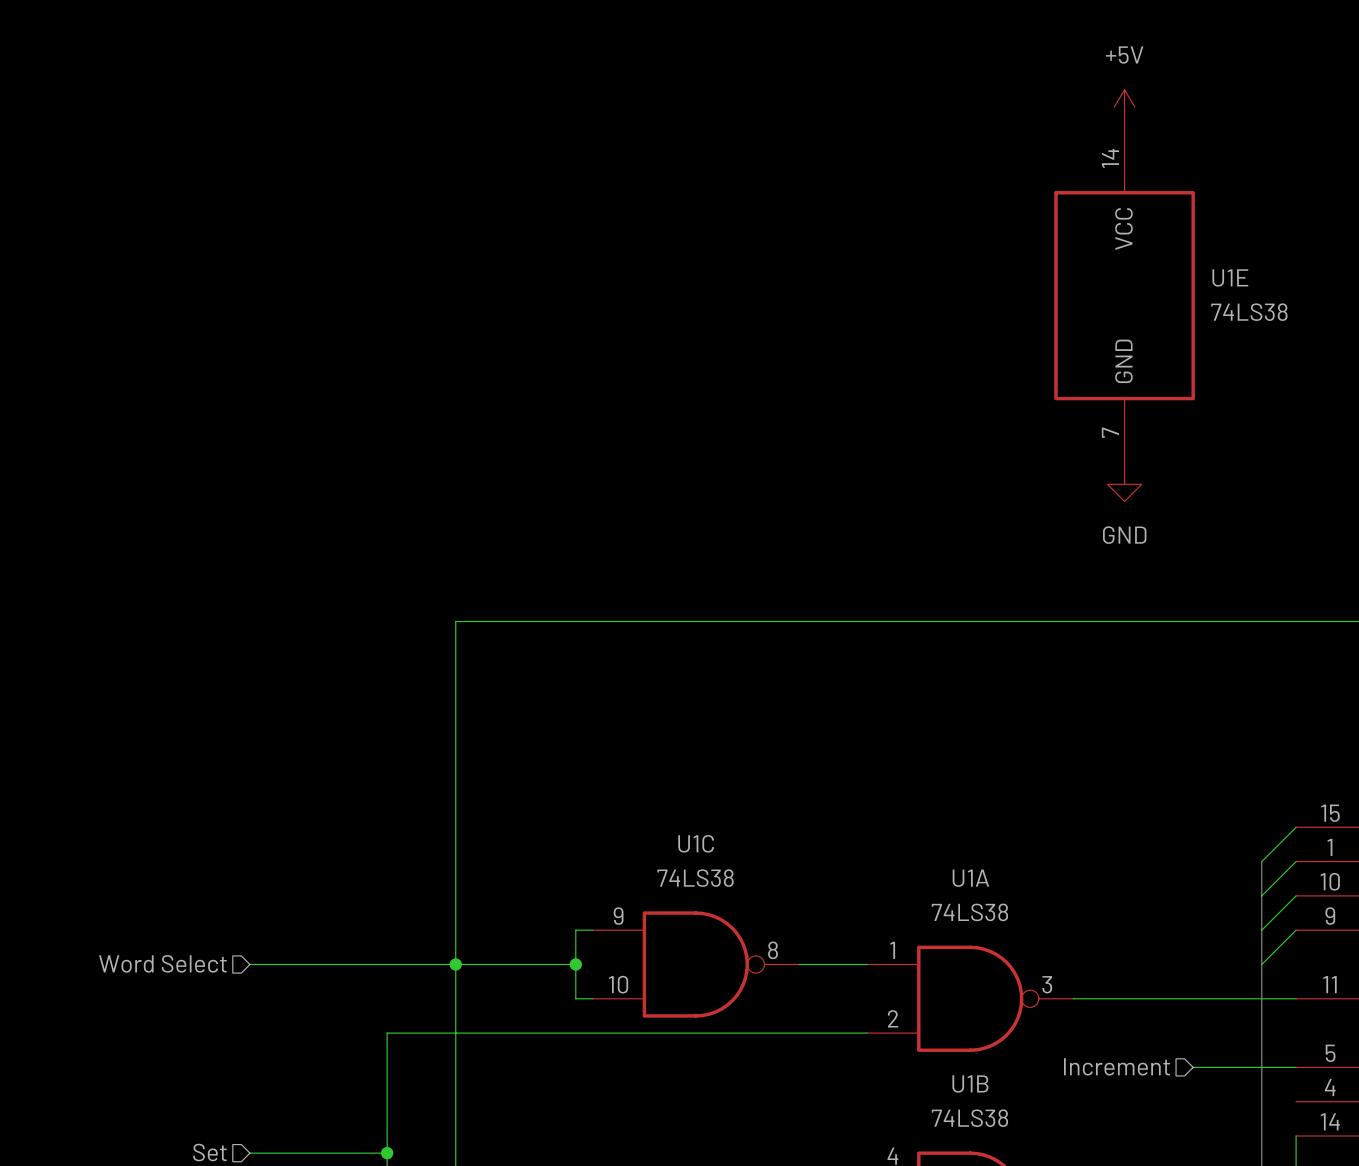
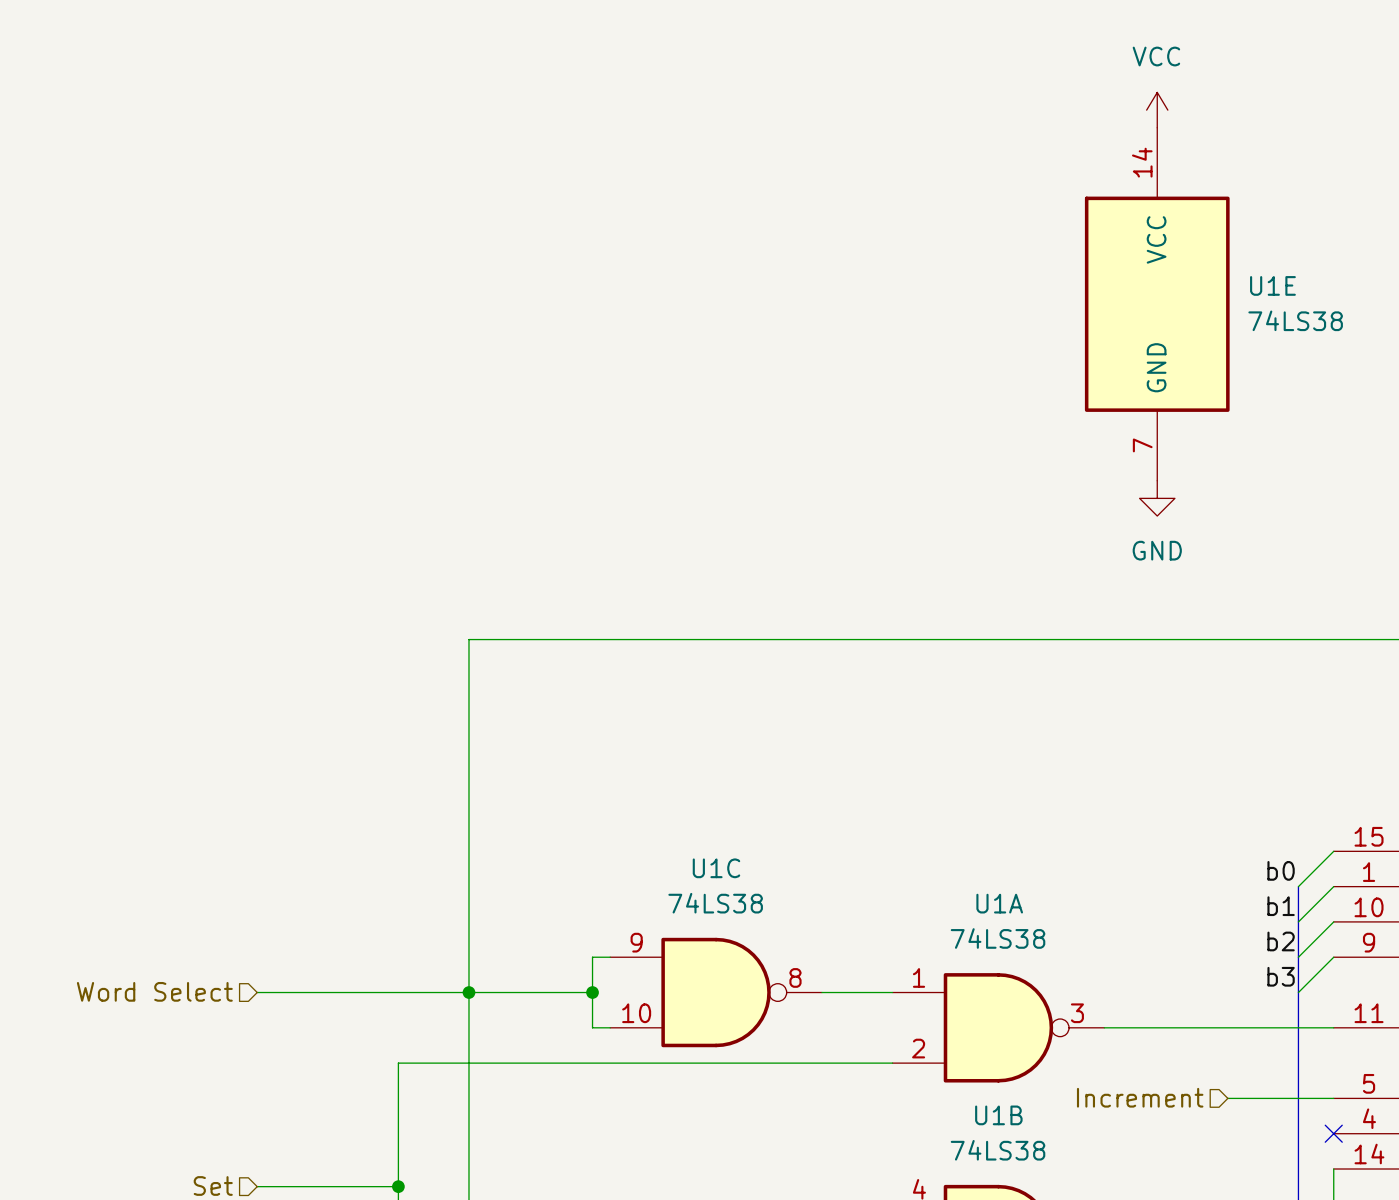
power symbol: +5V (1124, 107) -> VCC (1157, 110)
label: none -> b0 (1281, 870)
label: none -> b1 (1281, 906)
label: none -> b2 (1281, 941)
label: none -> b3 (1281, 976)
no-connect mark: none -> (1333, 1133)

